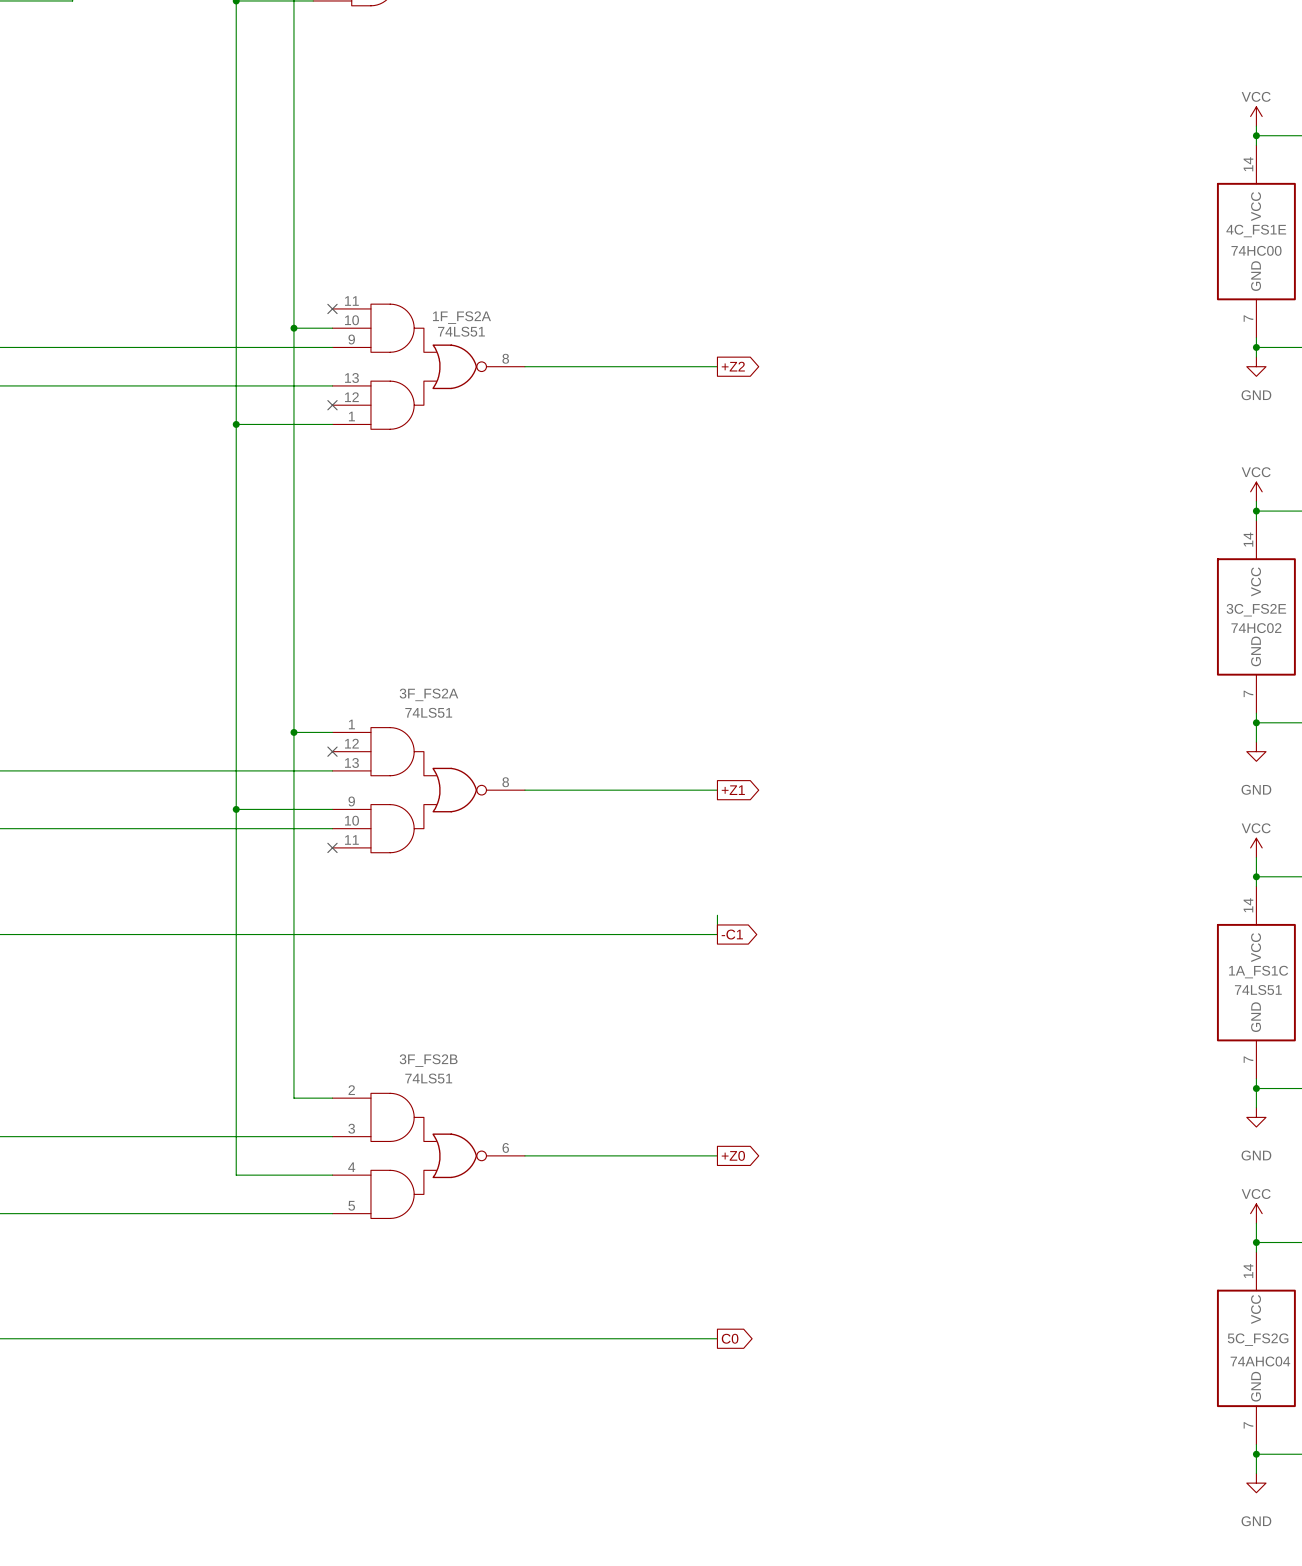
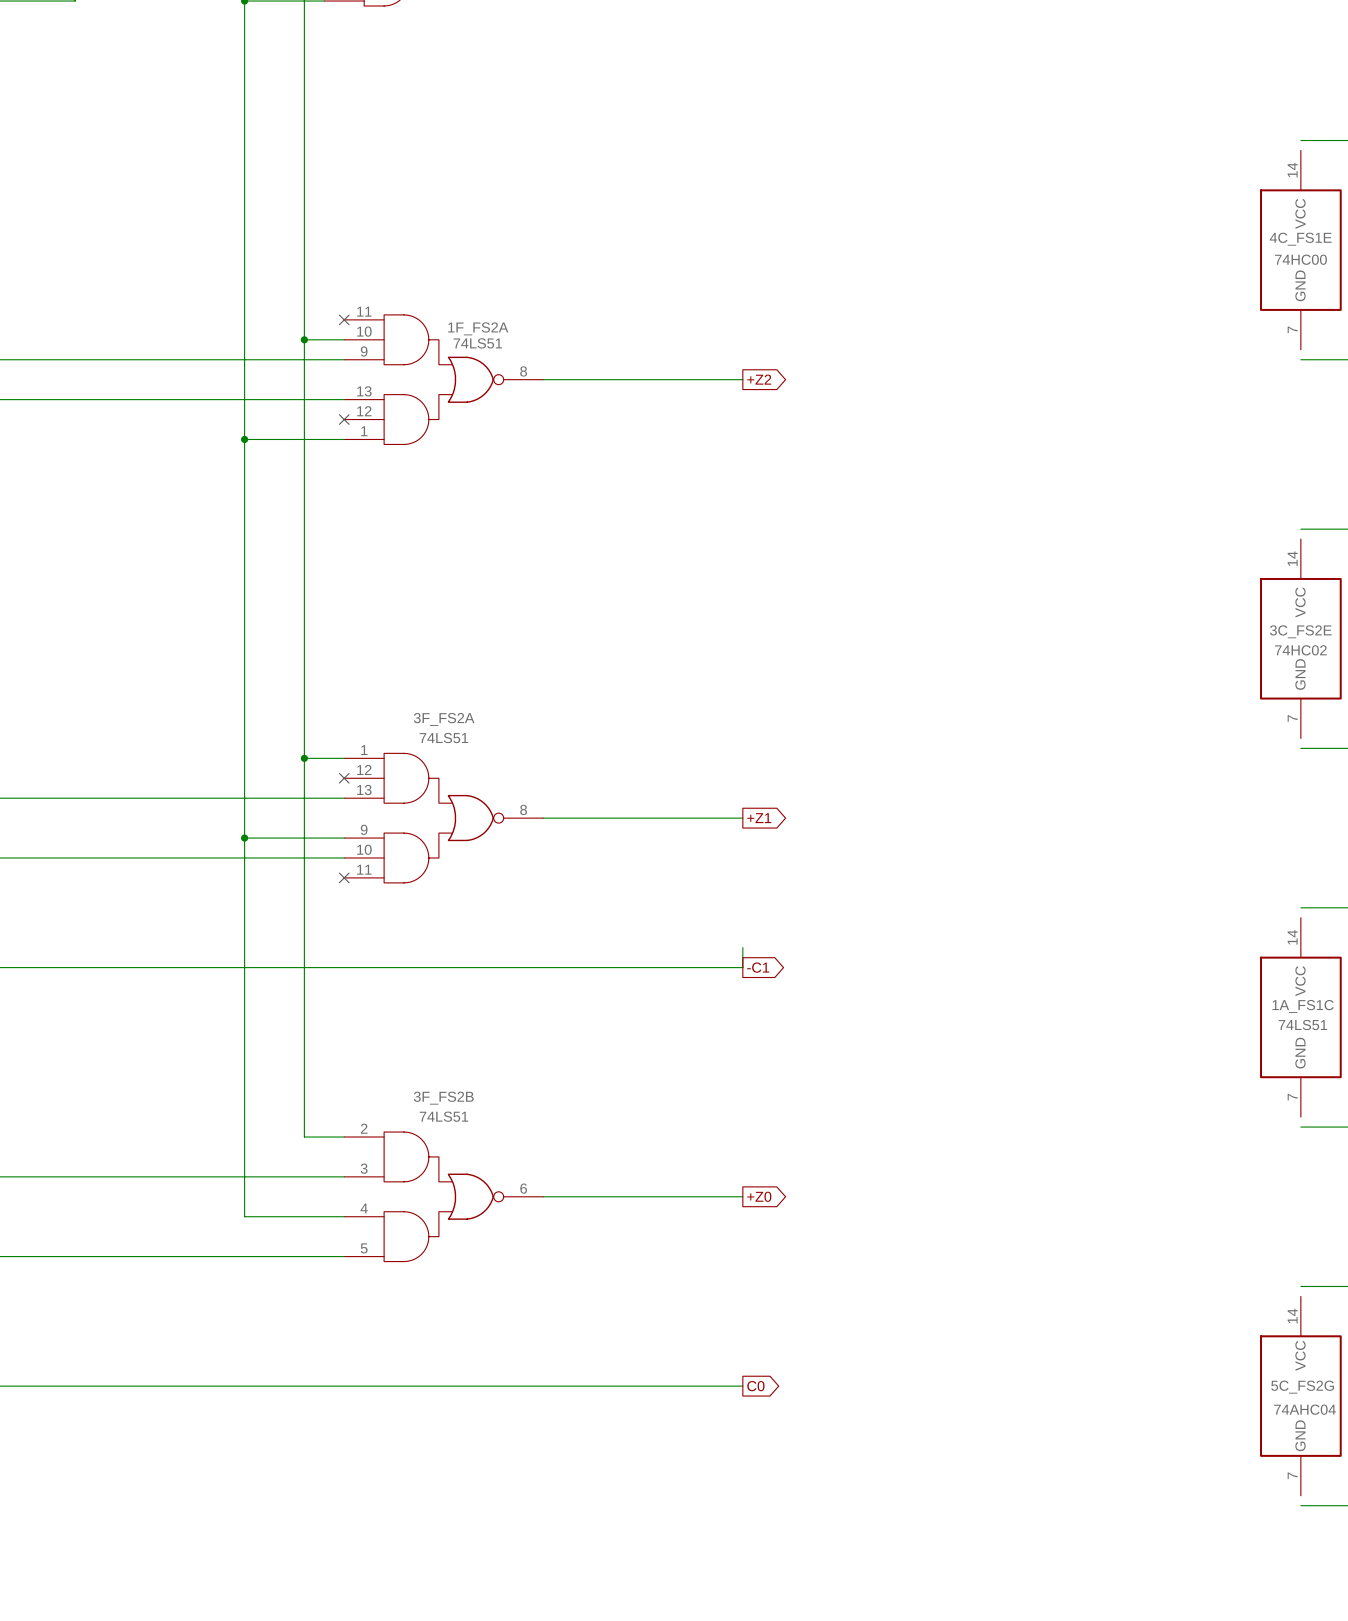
power symbol: VCC (1256, 116) -> none
wire: (1256, 126) (1256, 145) -> none
junction: (1256, 135) -> none
wire: (1256, 337) (1256, 357) -> none
junction: (1256, 347) -> none
power symbol: GND (1256, 366) -> none
power symbol: VCC (1256, 491) -> none
wire: (1256, 501) (1256, 520) -> none
junction: (1256, 511) -> none
wire: (1256, 713) (1256, 742) -> none
junction: (1256, 722) -> none
power symbol: GND (1256, 751) -> none
power symbol: VCC (1256, 847) -> none
wire: (1256, 857) (1256, 886) -> none
junction: (1256, 876) -> none
wire: (1256, 1078) (1256, 1107) -> none
junction: (1256, 1088) -> none
power symbol: GND (1256, 1117) -> none
power symbol: VCC (1256, 1213) -> none
wire: (1256, 1223) (1256, 1252) -> none
junction: (1256, 1242) -> none
wire: (1256, 1444) (1256, 1473) -> none
junction: (1256, 1454) -> none
power symbol: GND (1256, 1483) -> none

